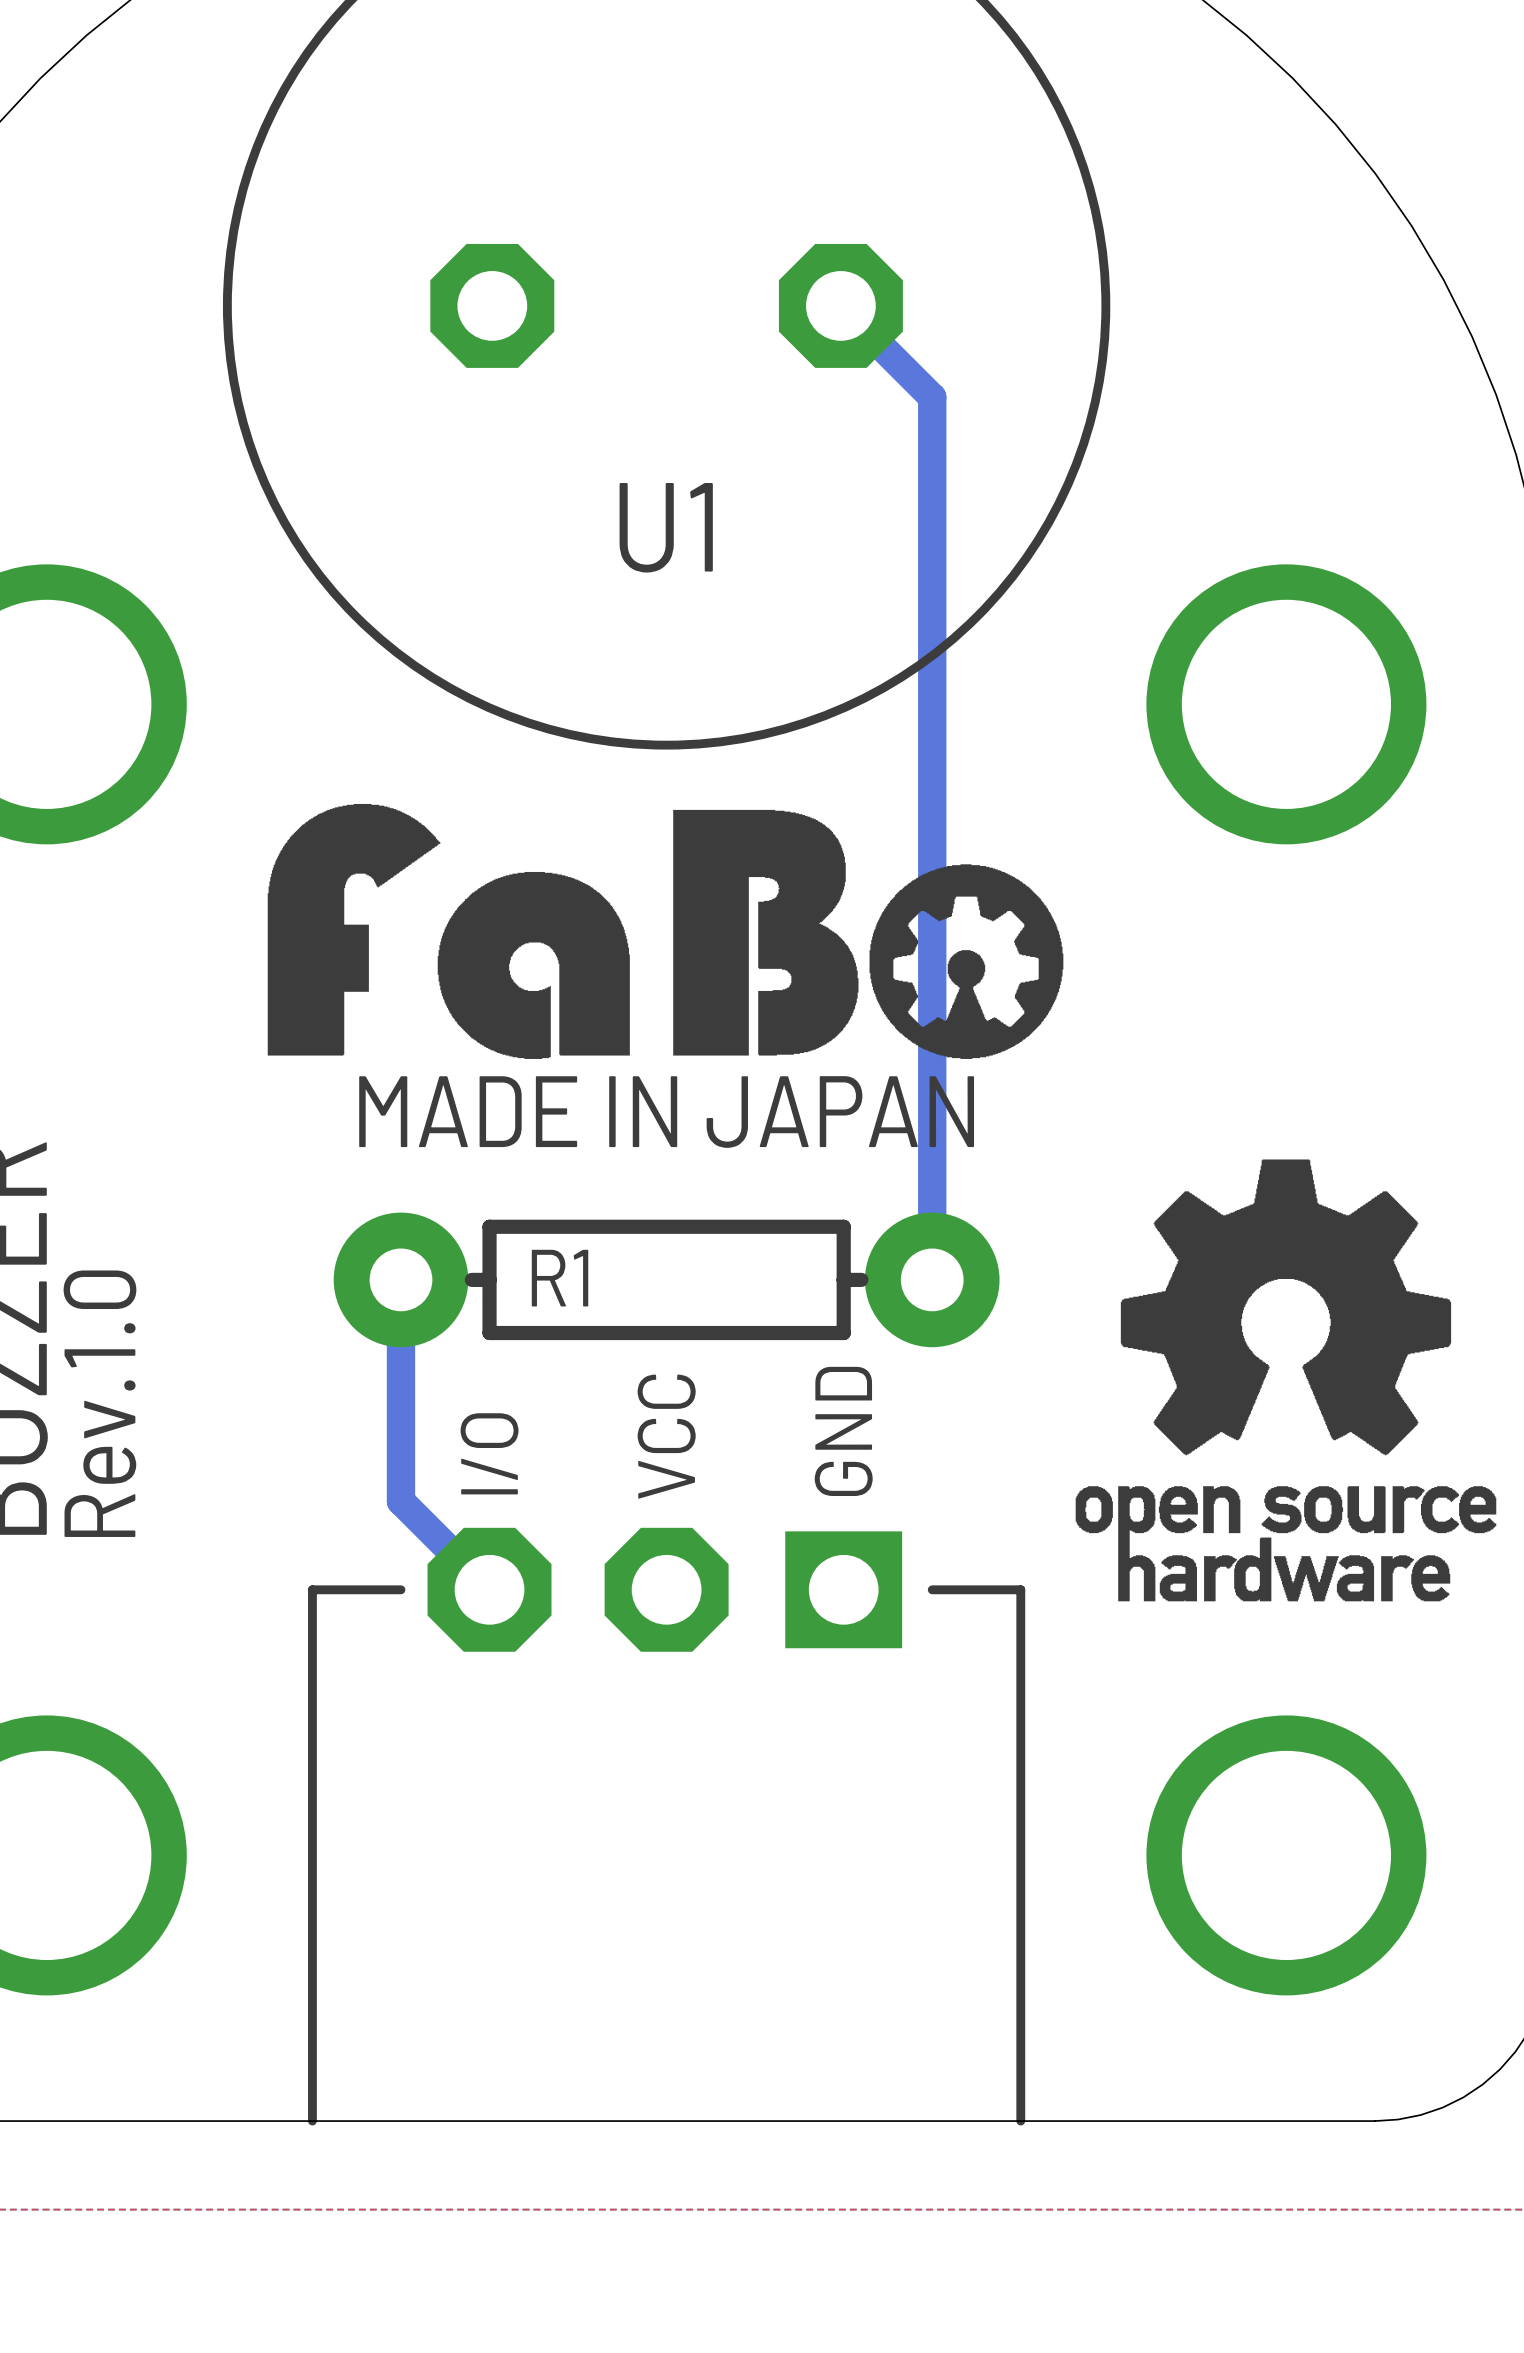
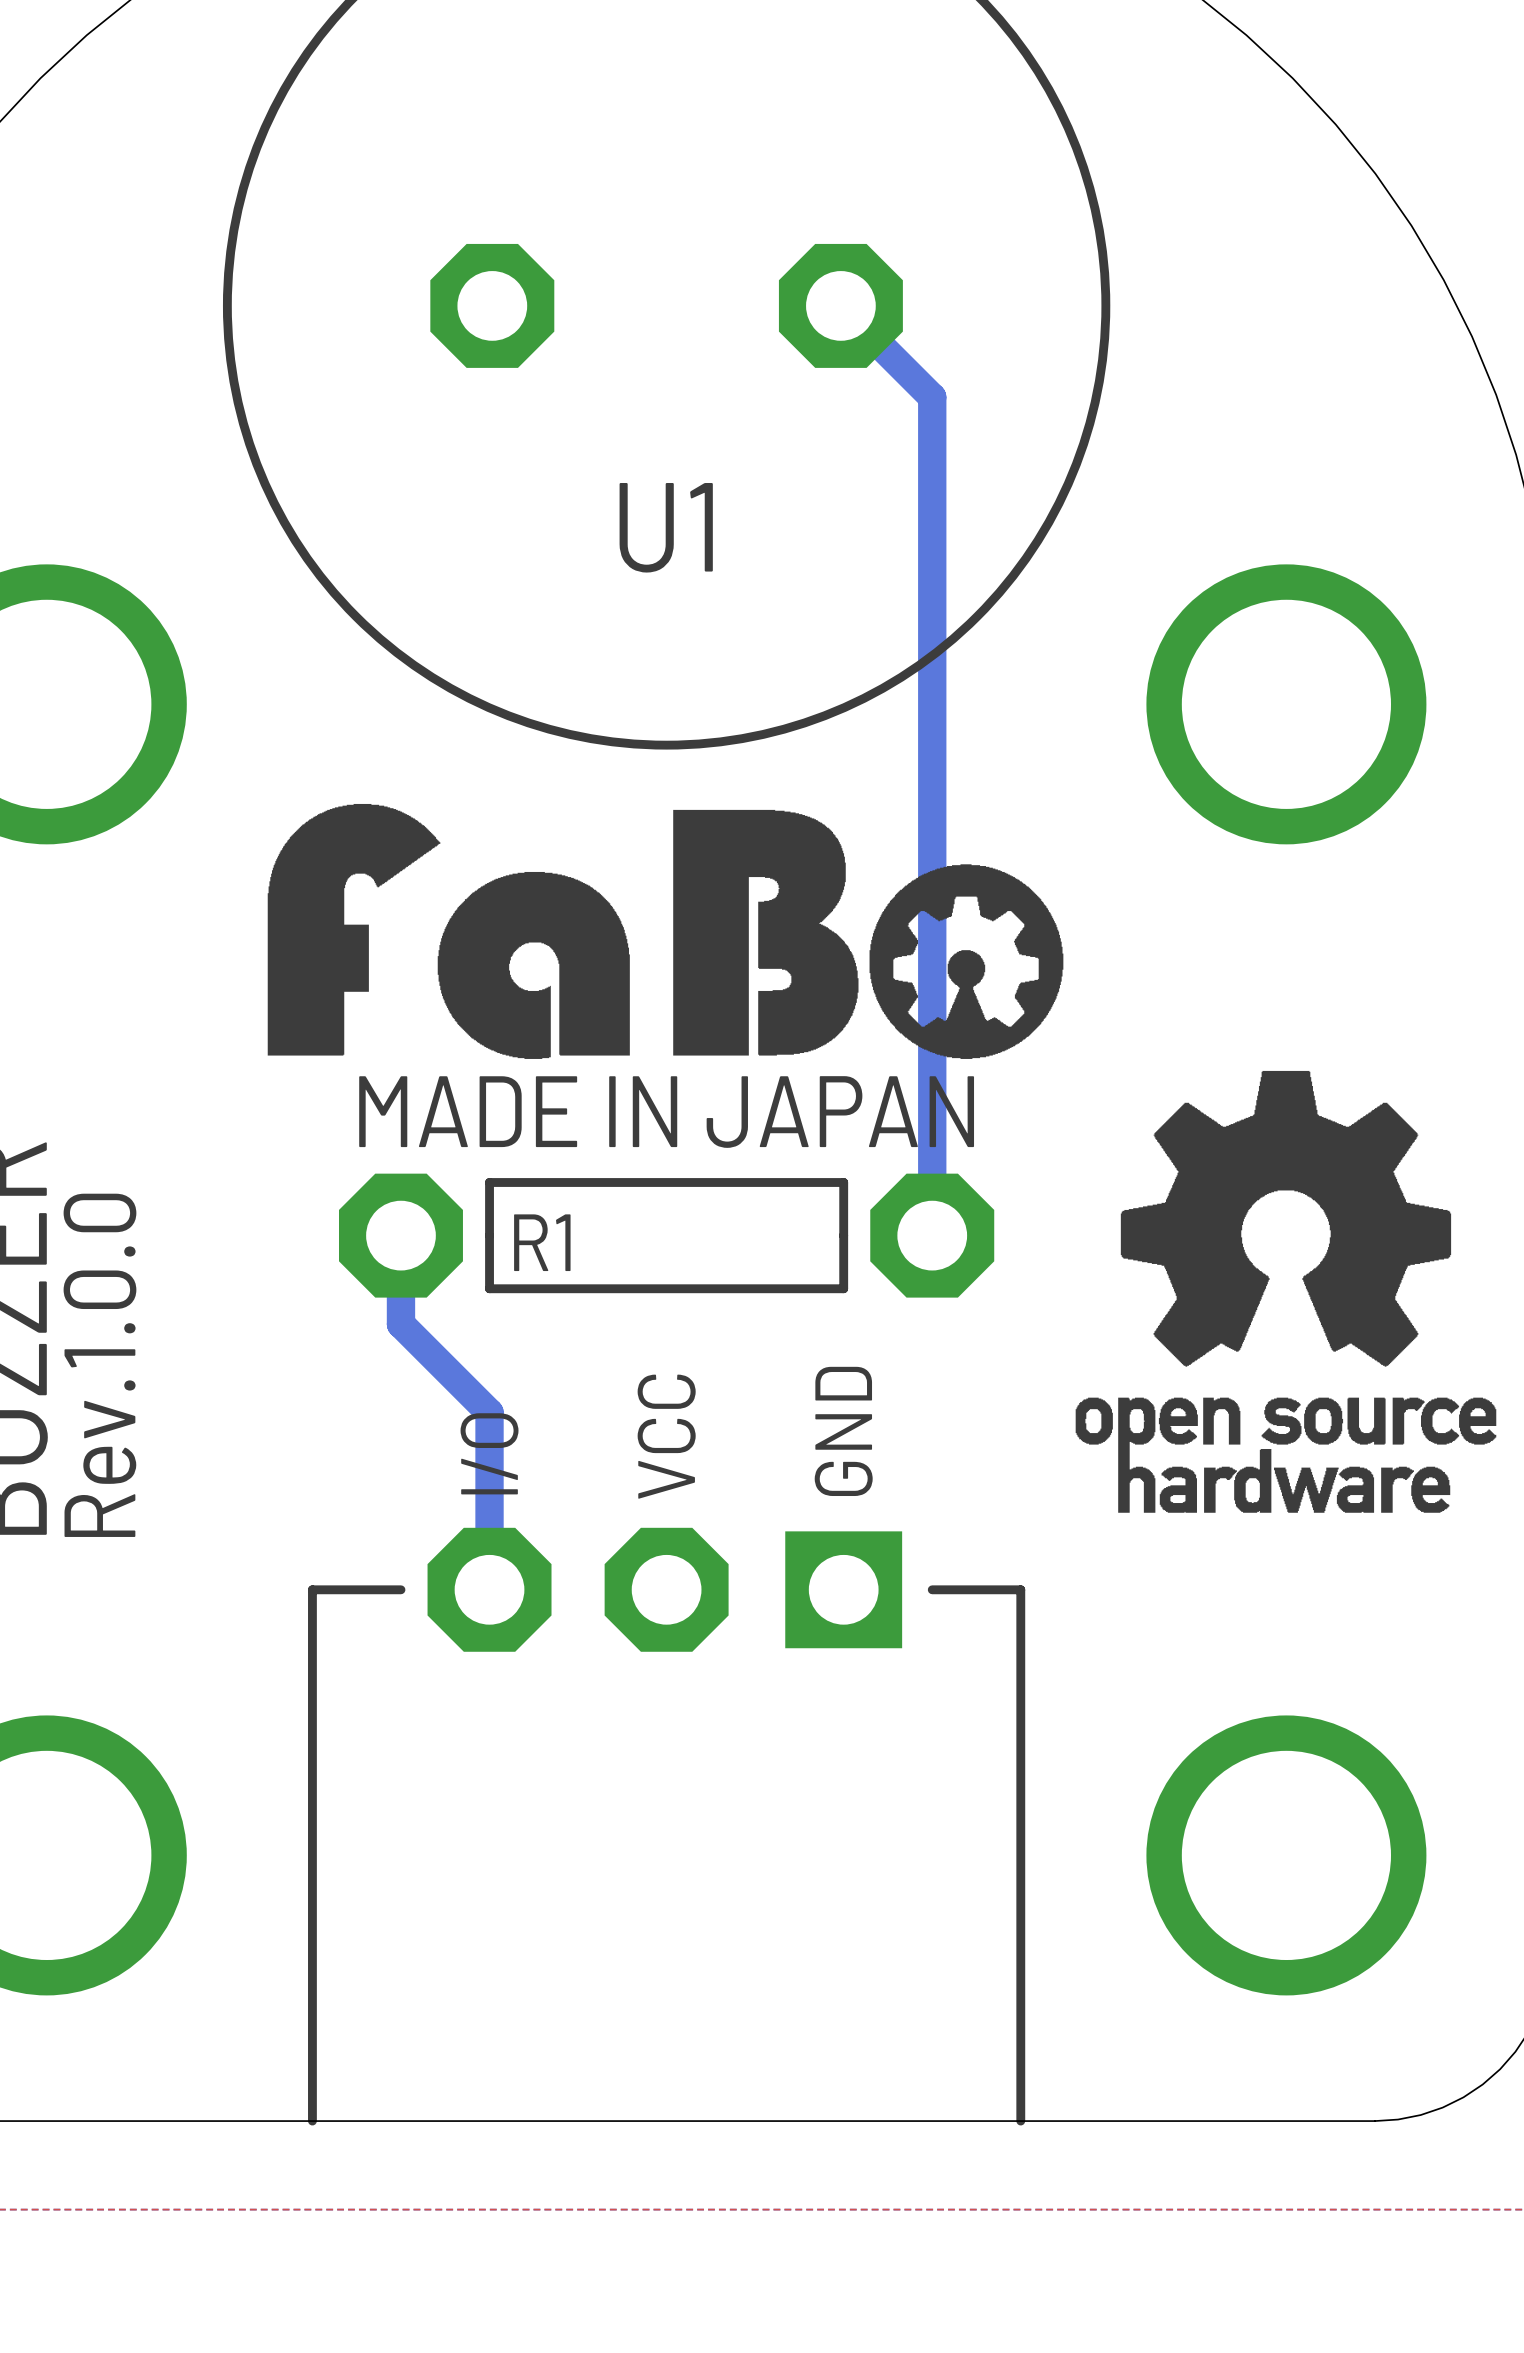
R1 footprint: [333, 1212, 1000, 1348] -> [339, 1173, 995, 1298]
R1 name position: R1 (560, 1278) -> R1 (542, 1242)
bottom track: (400, 1324) (400, 1501) (489, 1589) -> (400, 1324) (489, 1412) (489, 1589)
drawing position: (1285, 1380) -> (1285, 1291)
text: Rev.1.0 (99, 1403) -> Rev.1.0.0 (99, 1365)

